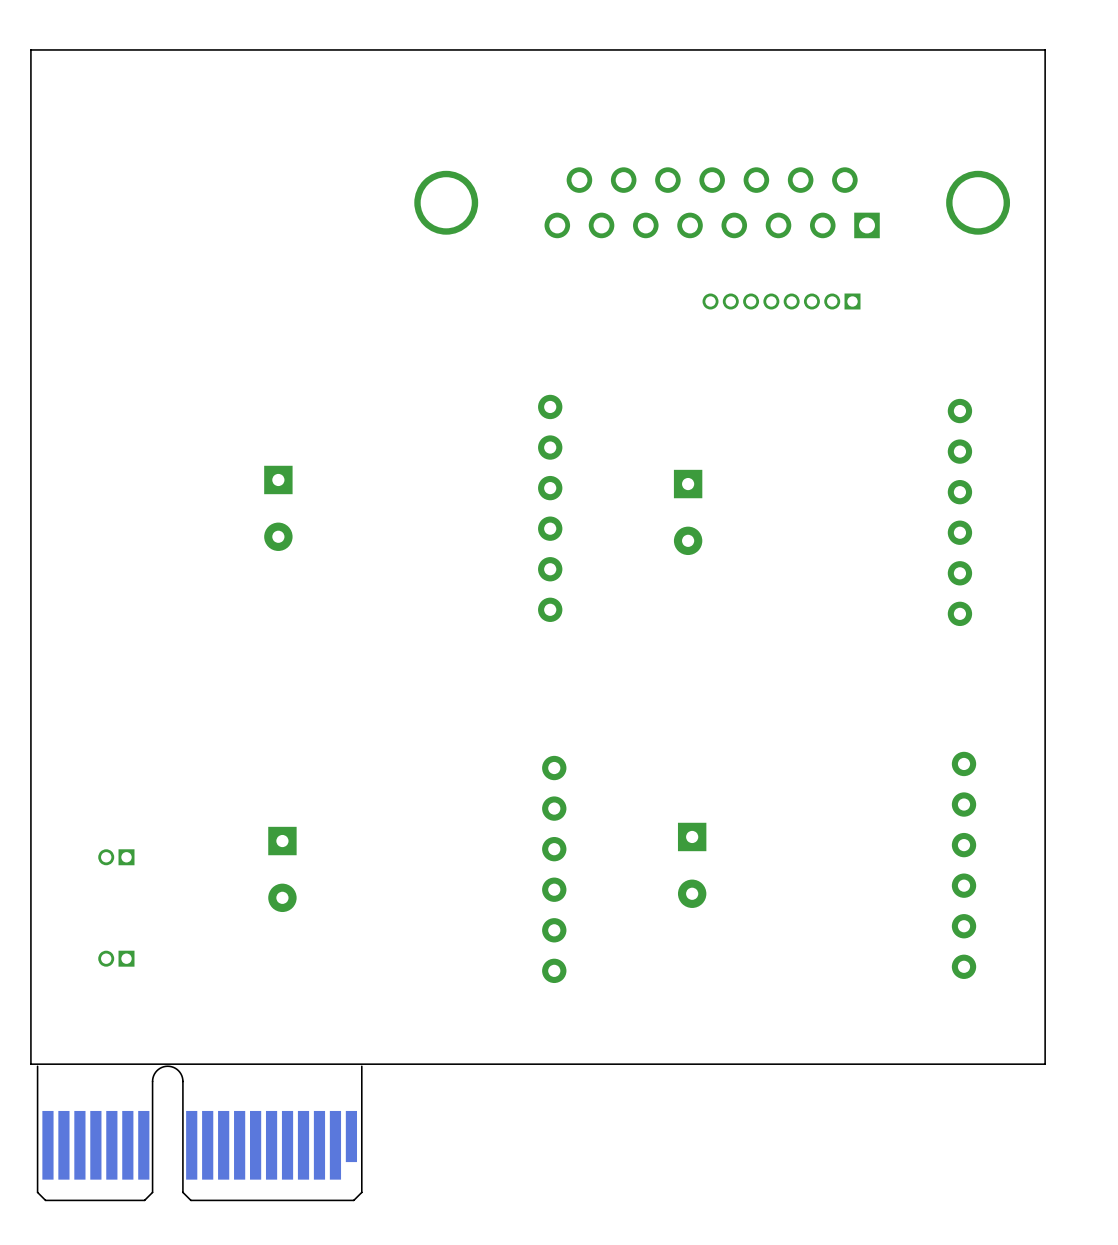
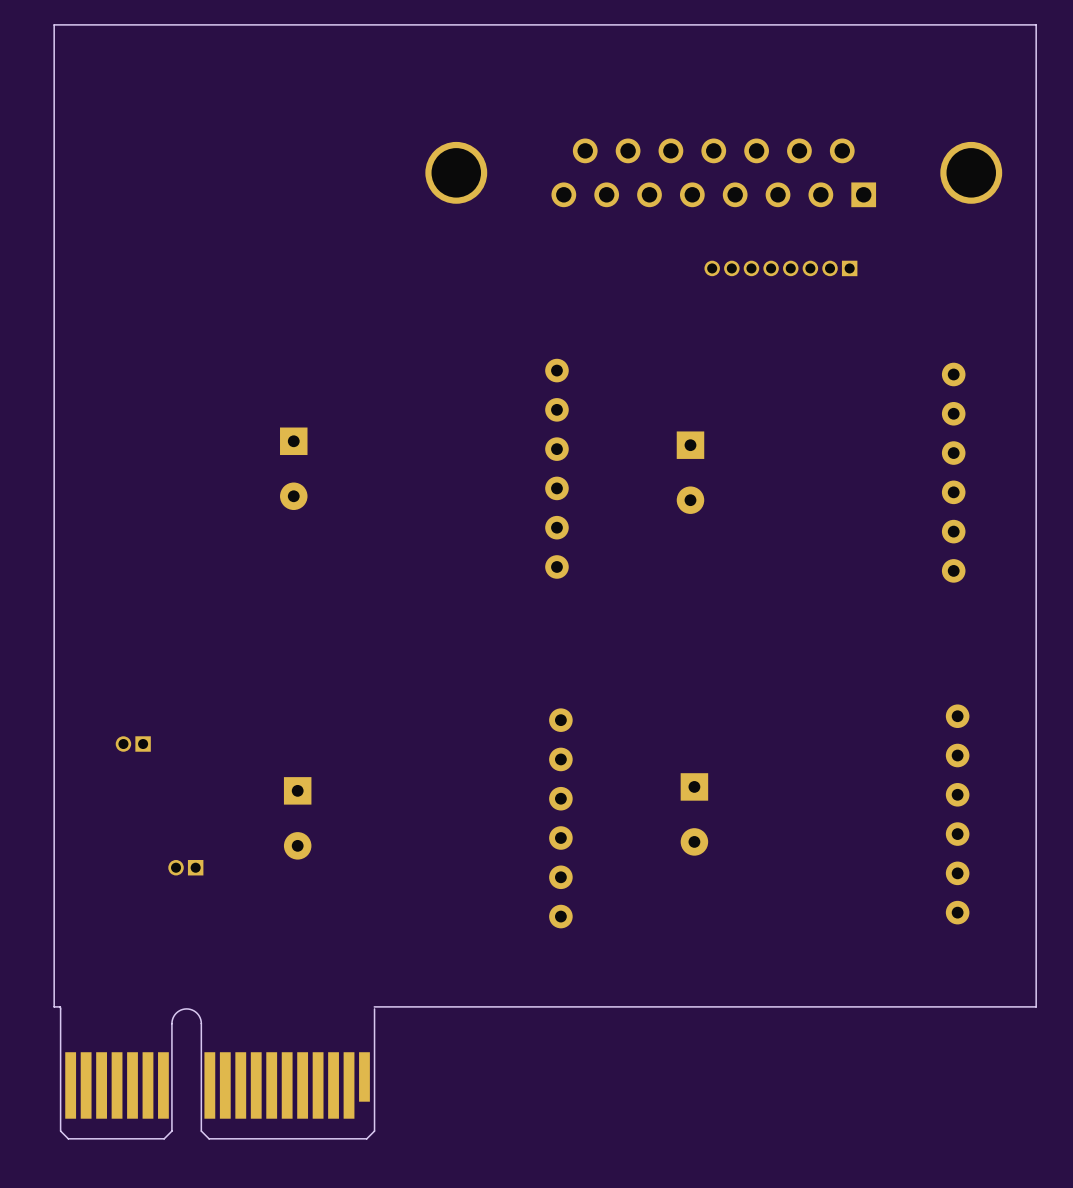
part: none -> (133, 744)
part: (116, 857) -> none
part: none -> (185, 867)
part: (116, 958) -> none
board edge: (361, 1064) (37, 1064) -> (60, 1008) (60, 1006)

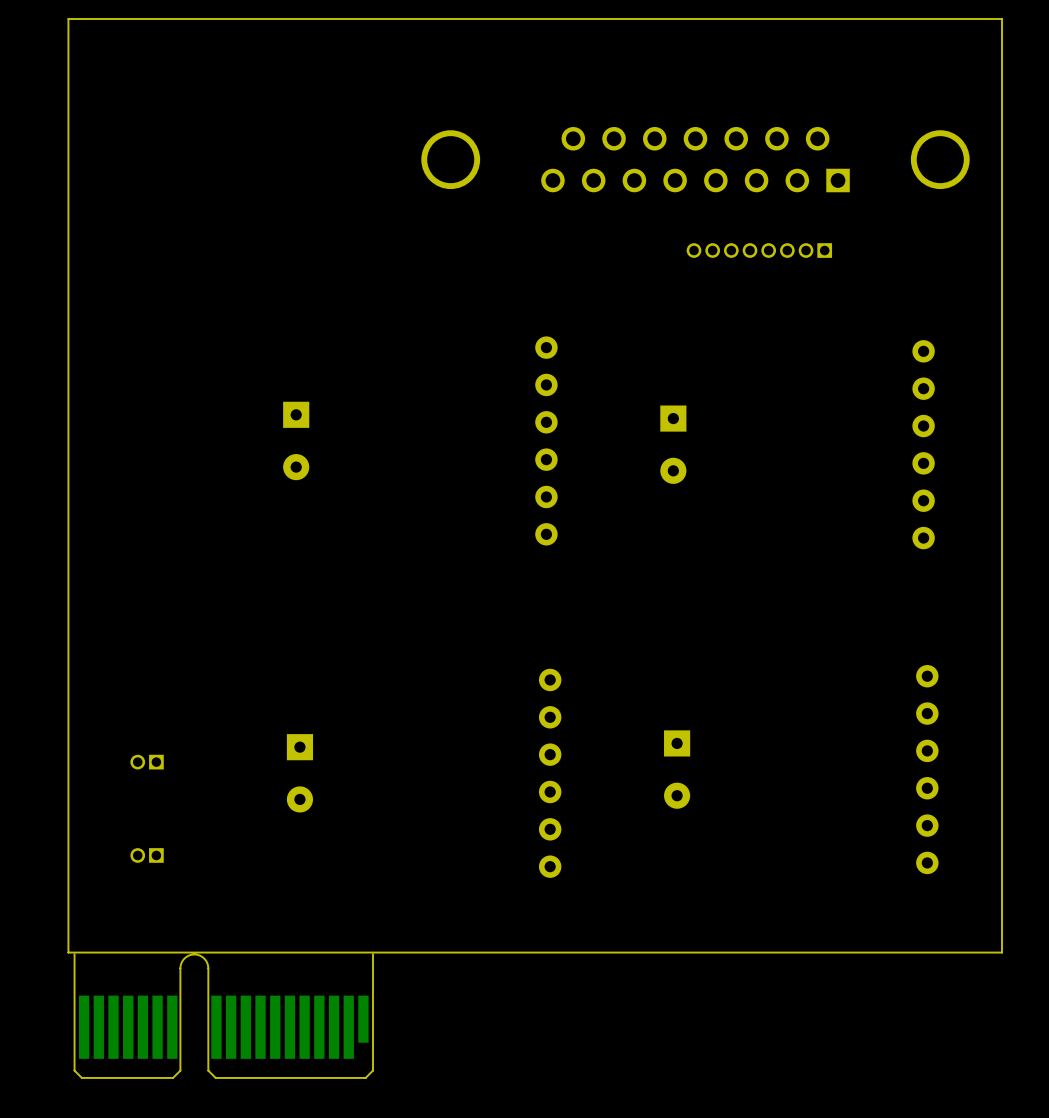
part: (133, 744) -> none
part: none -> (147, 762)
part: (185, 867) -> none
part: none -> (147, 855)
board edge: (60, 1006) (60, 1008) -> (74, 952) (372, 952)

